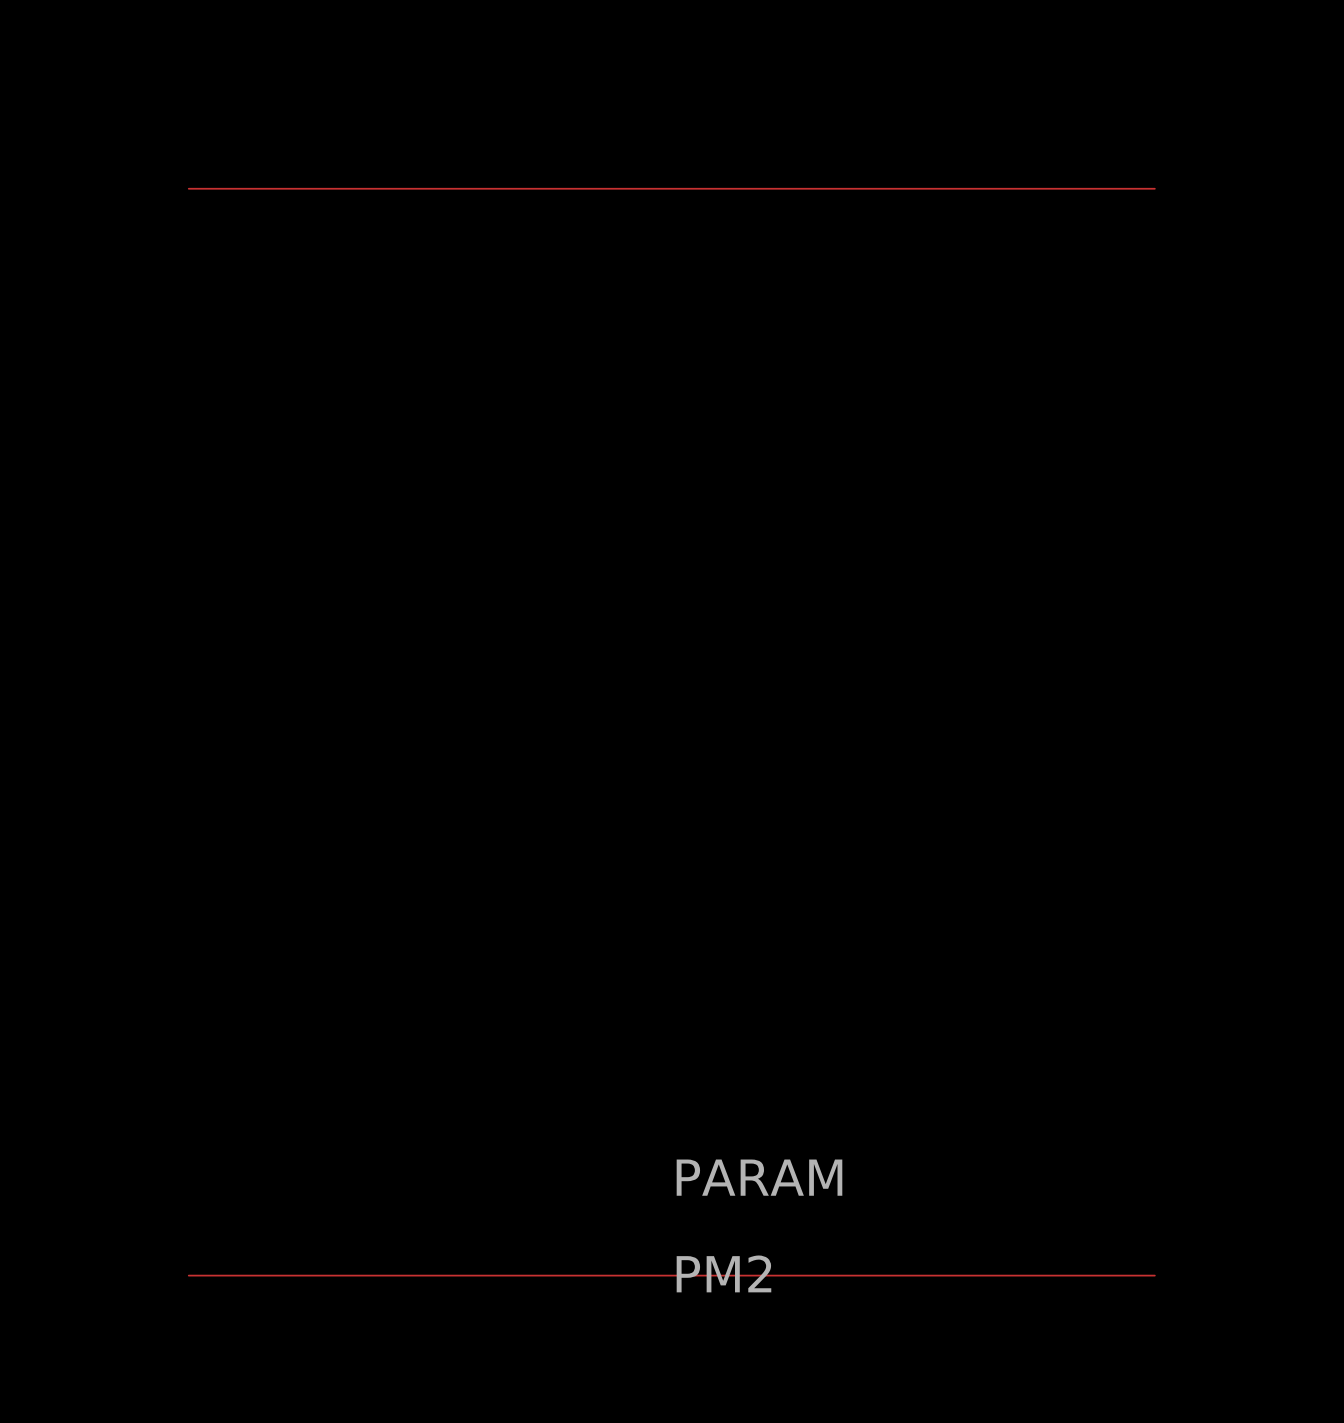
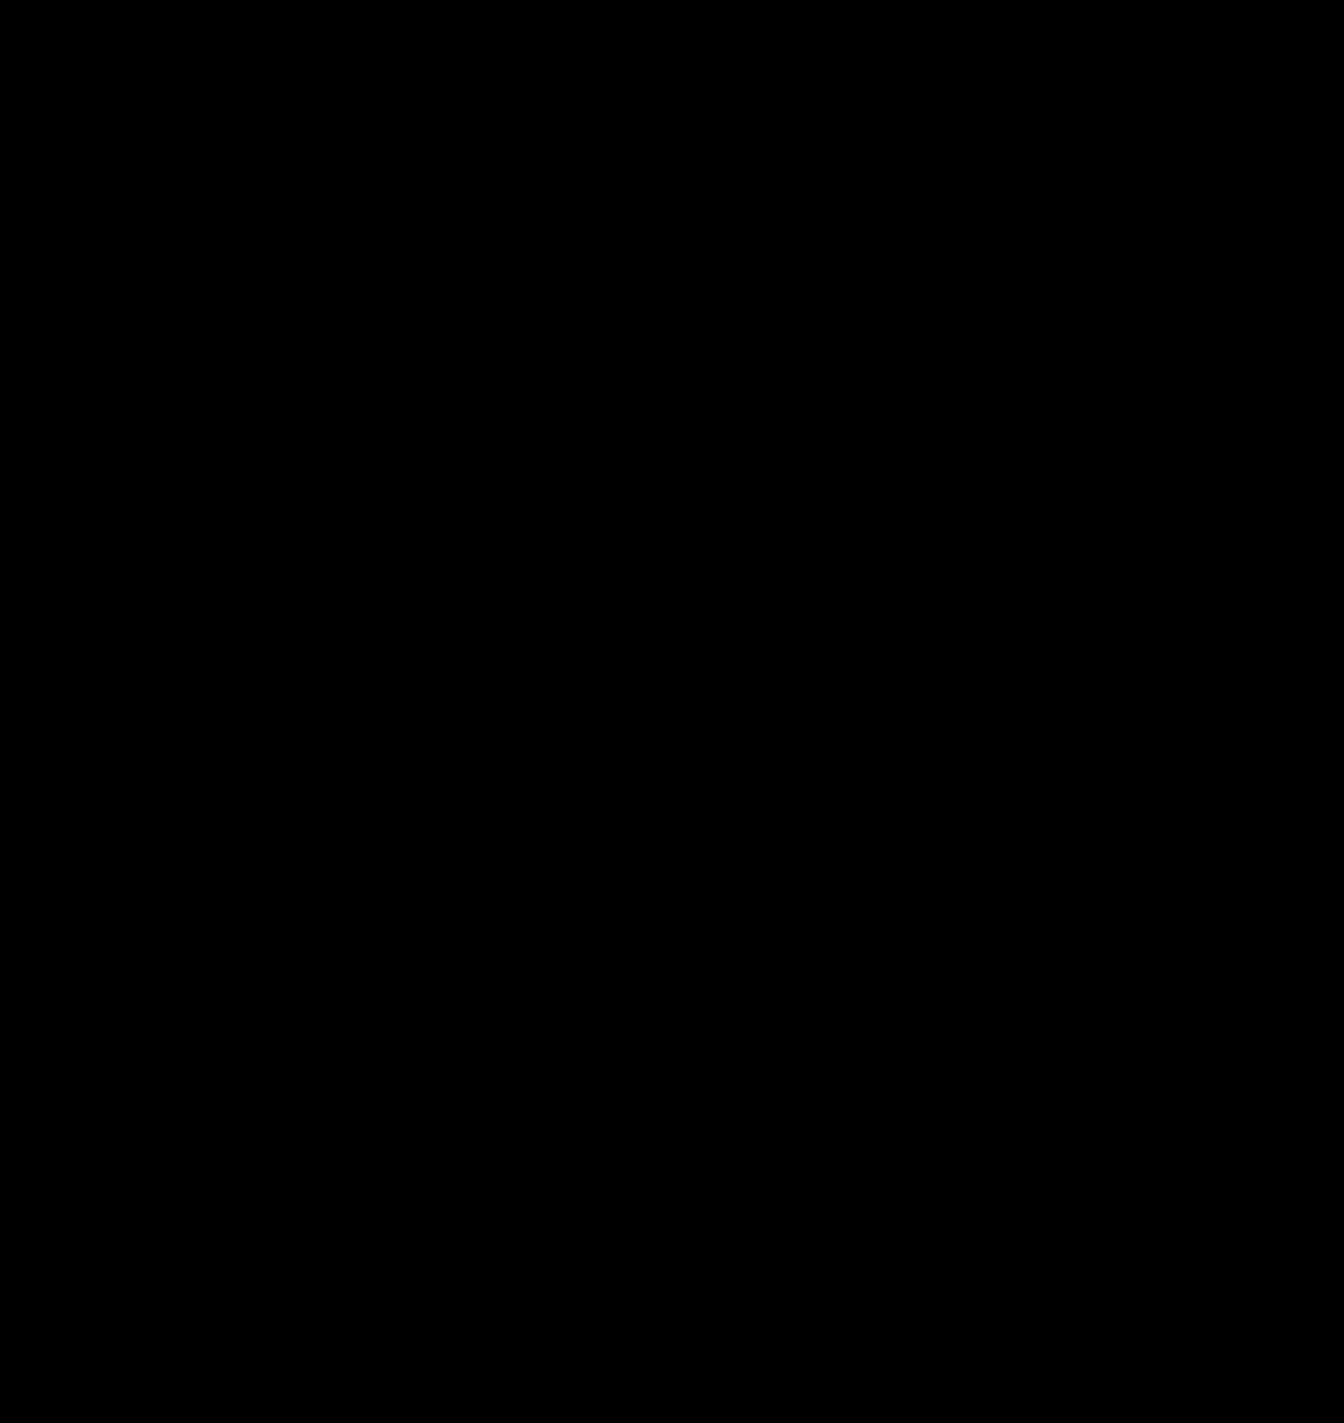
part: (671, 188) -> none
PM2: PARAM (671, 1275) -> none

